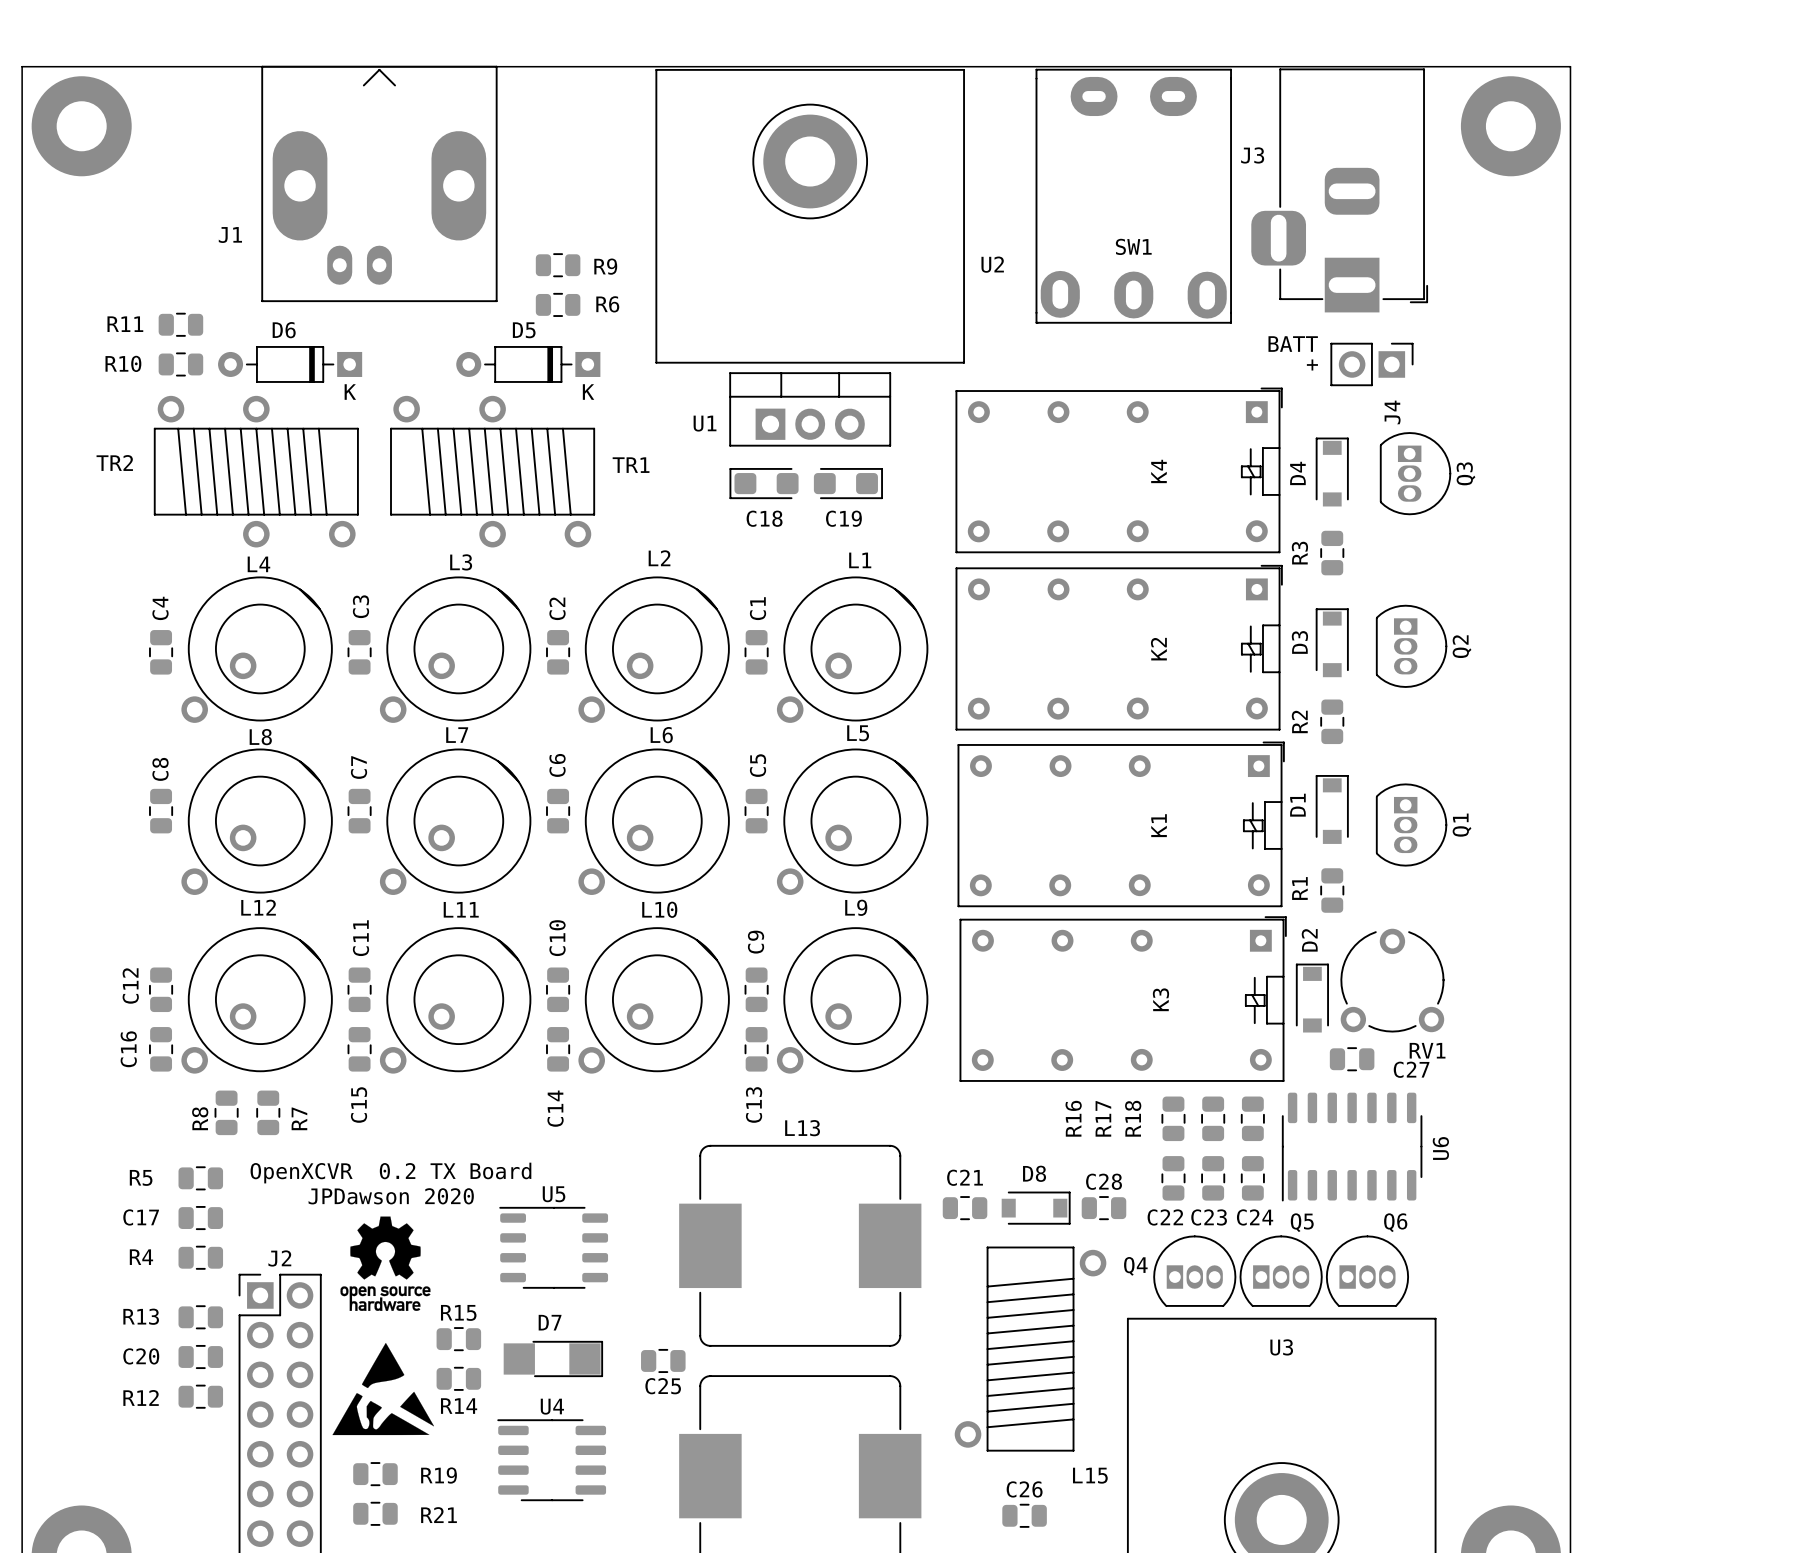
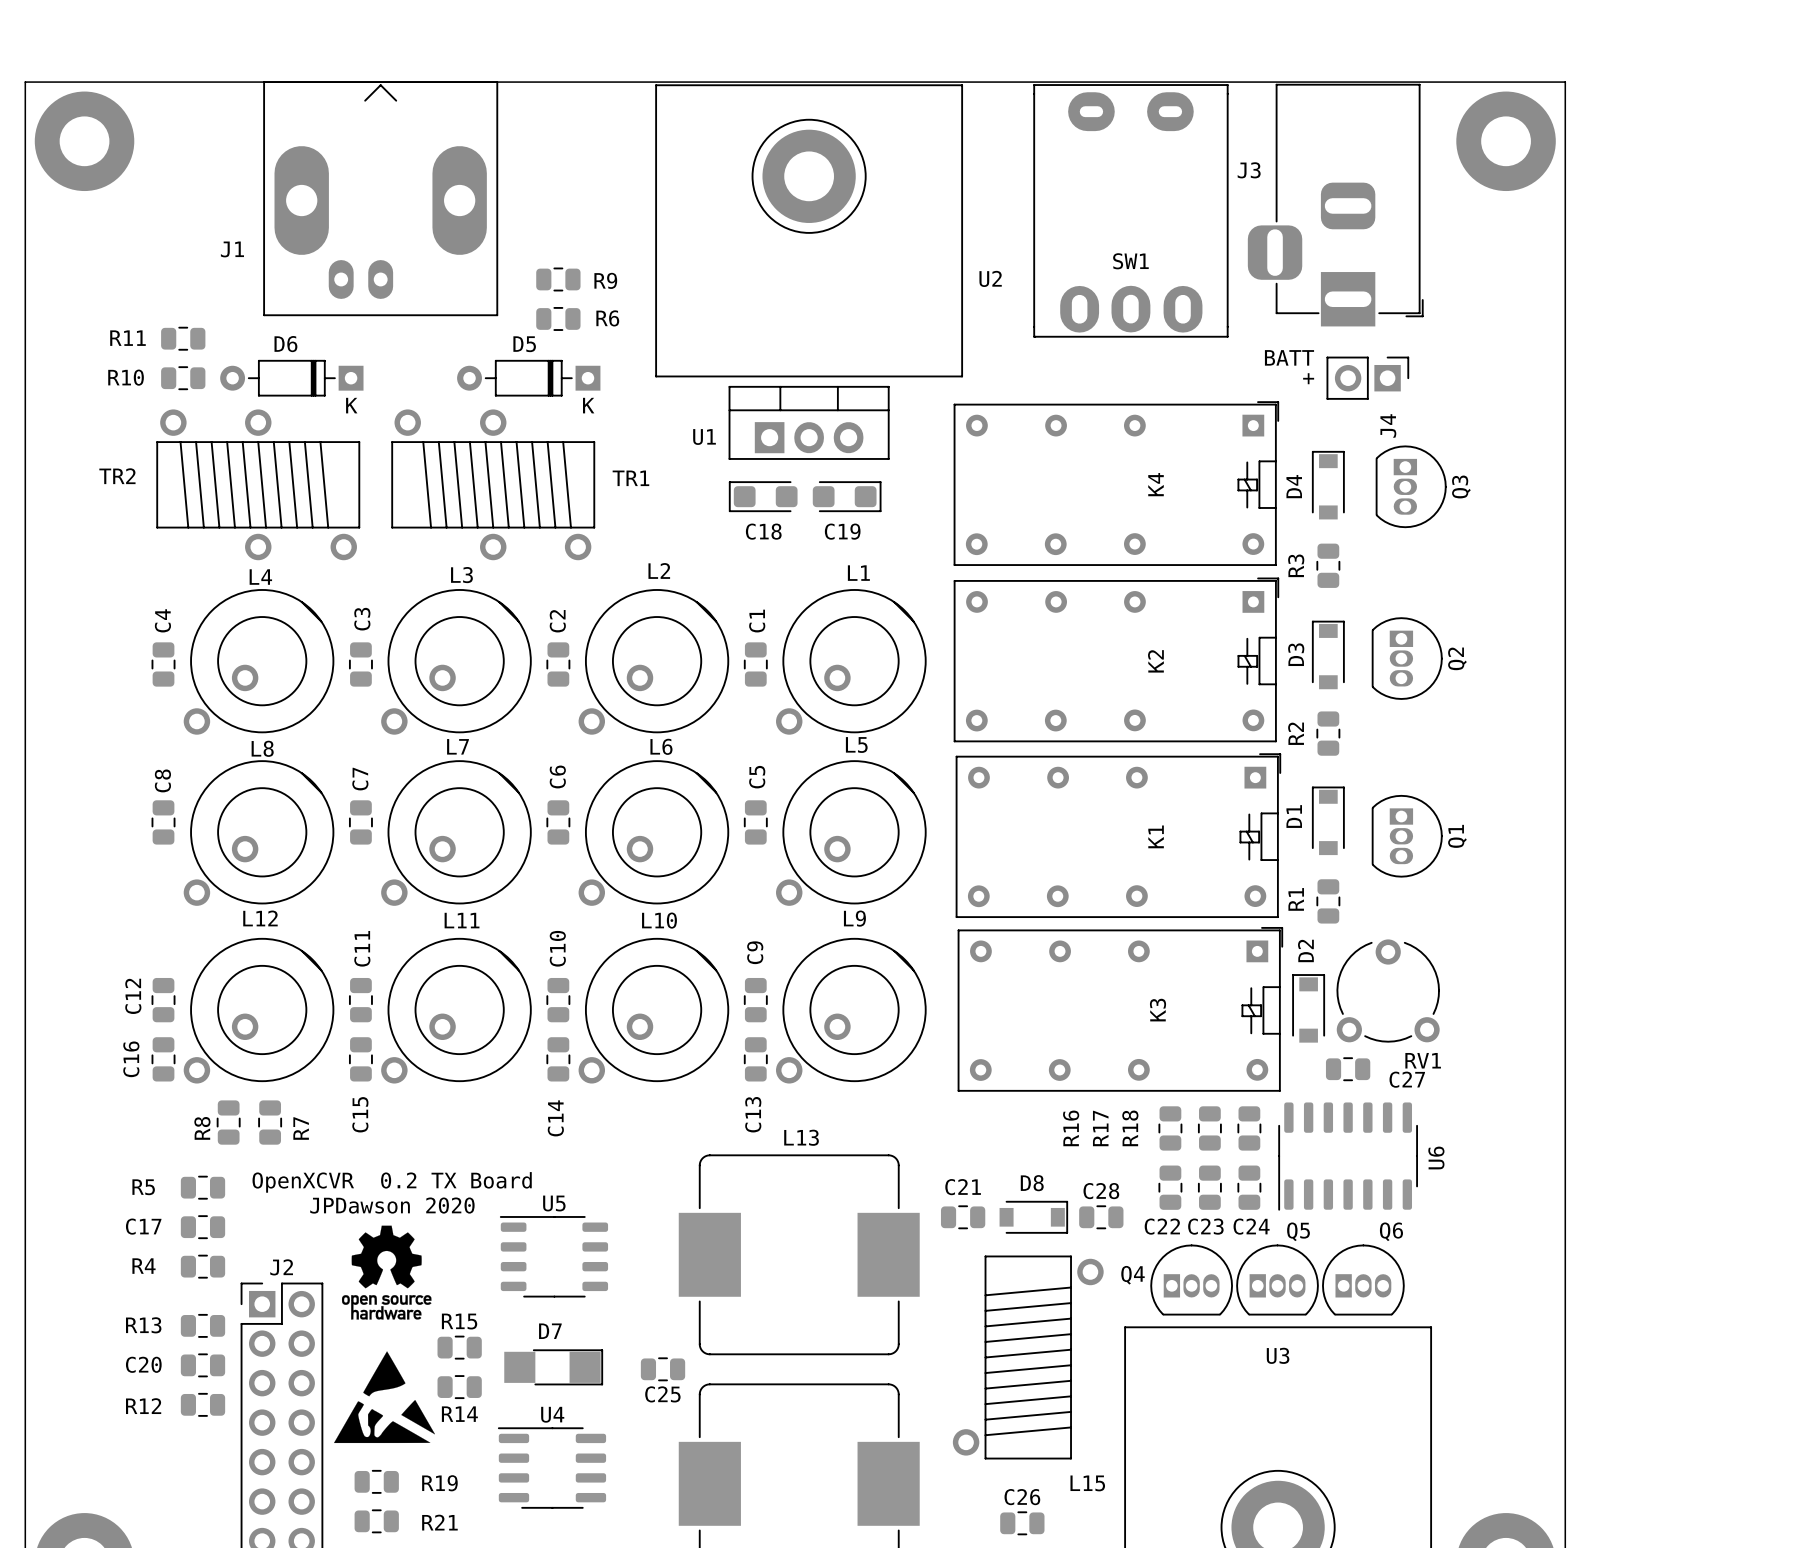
SW1 footprint: [1035, 68, 1232, 324] -> [1033, 84, 1229, 338]

